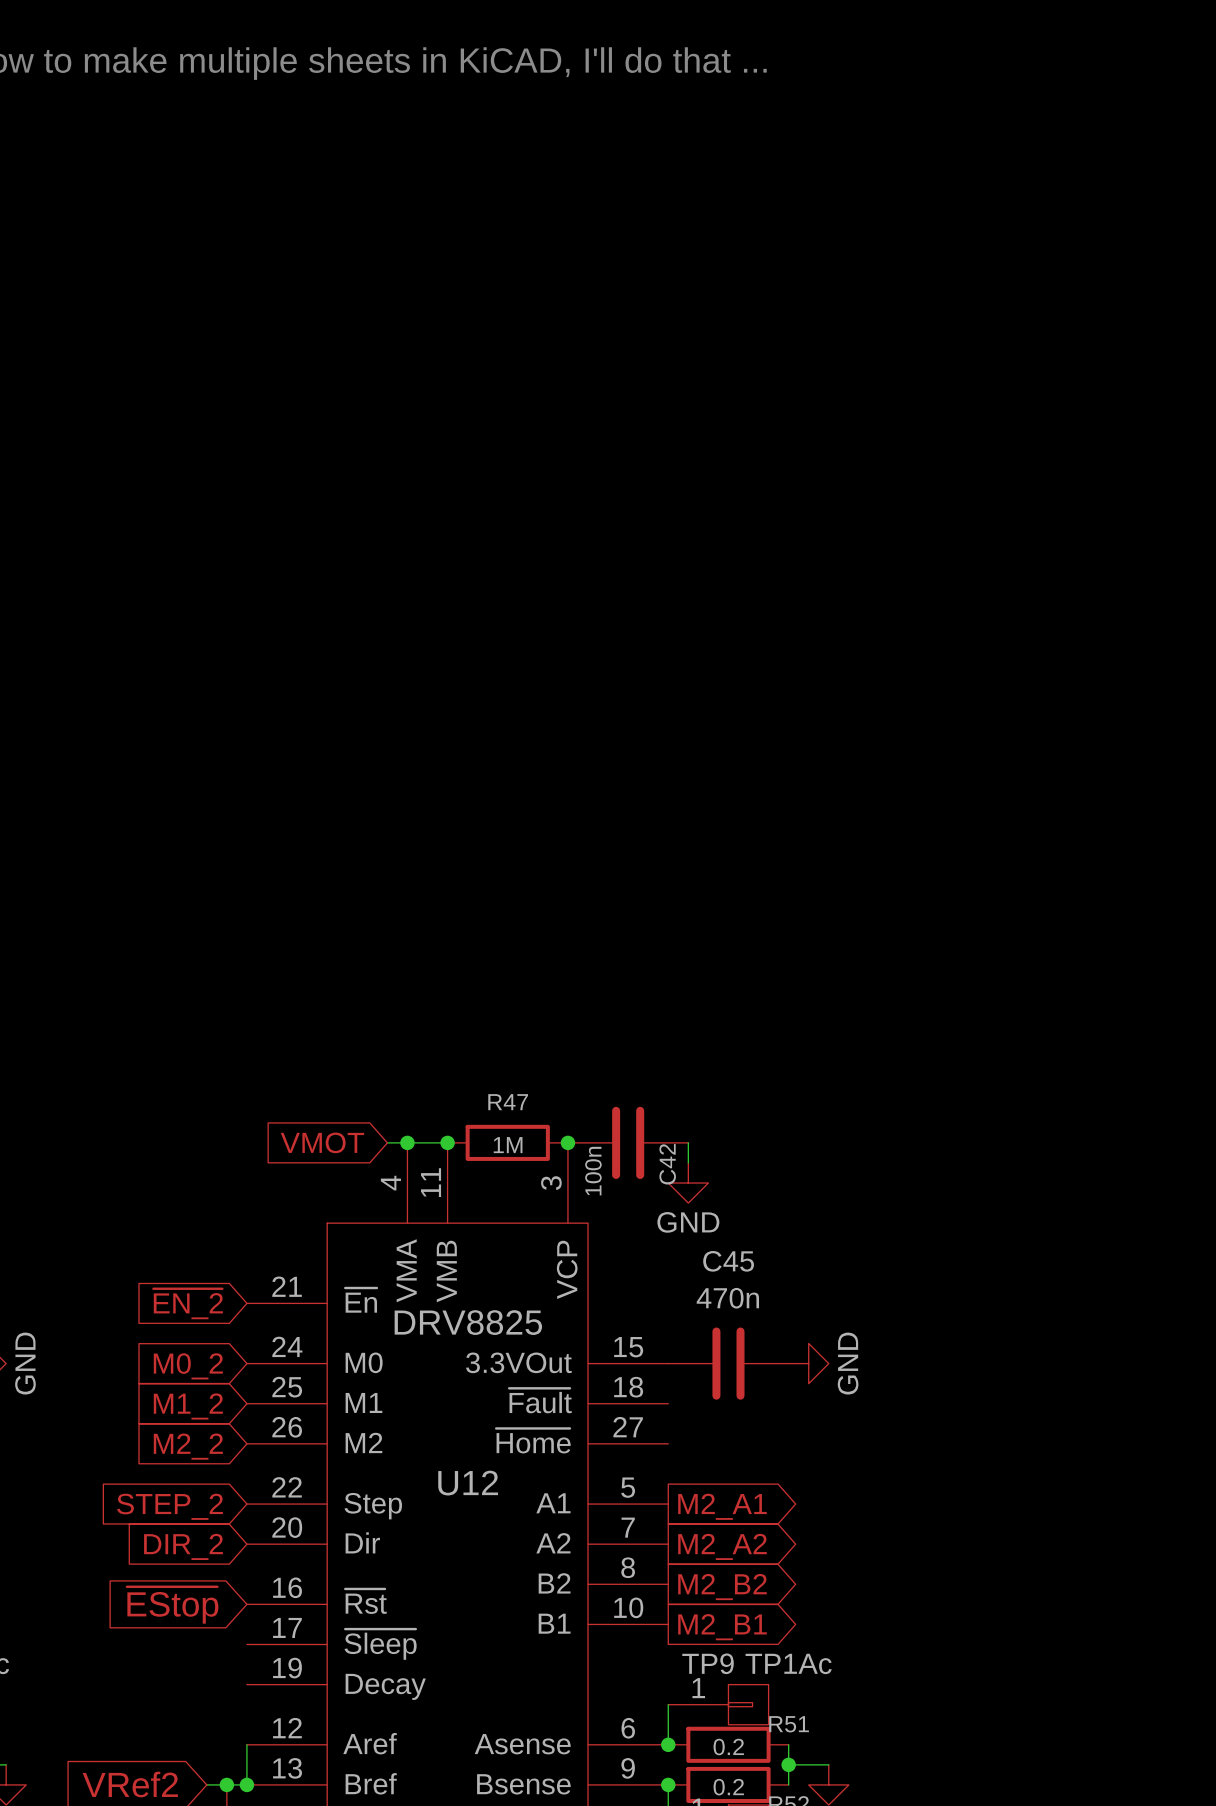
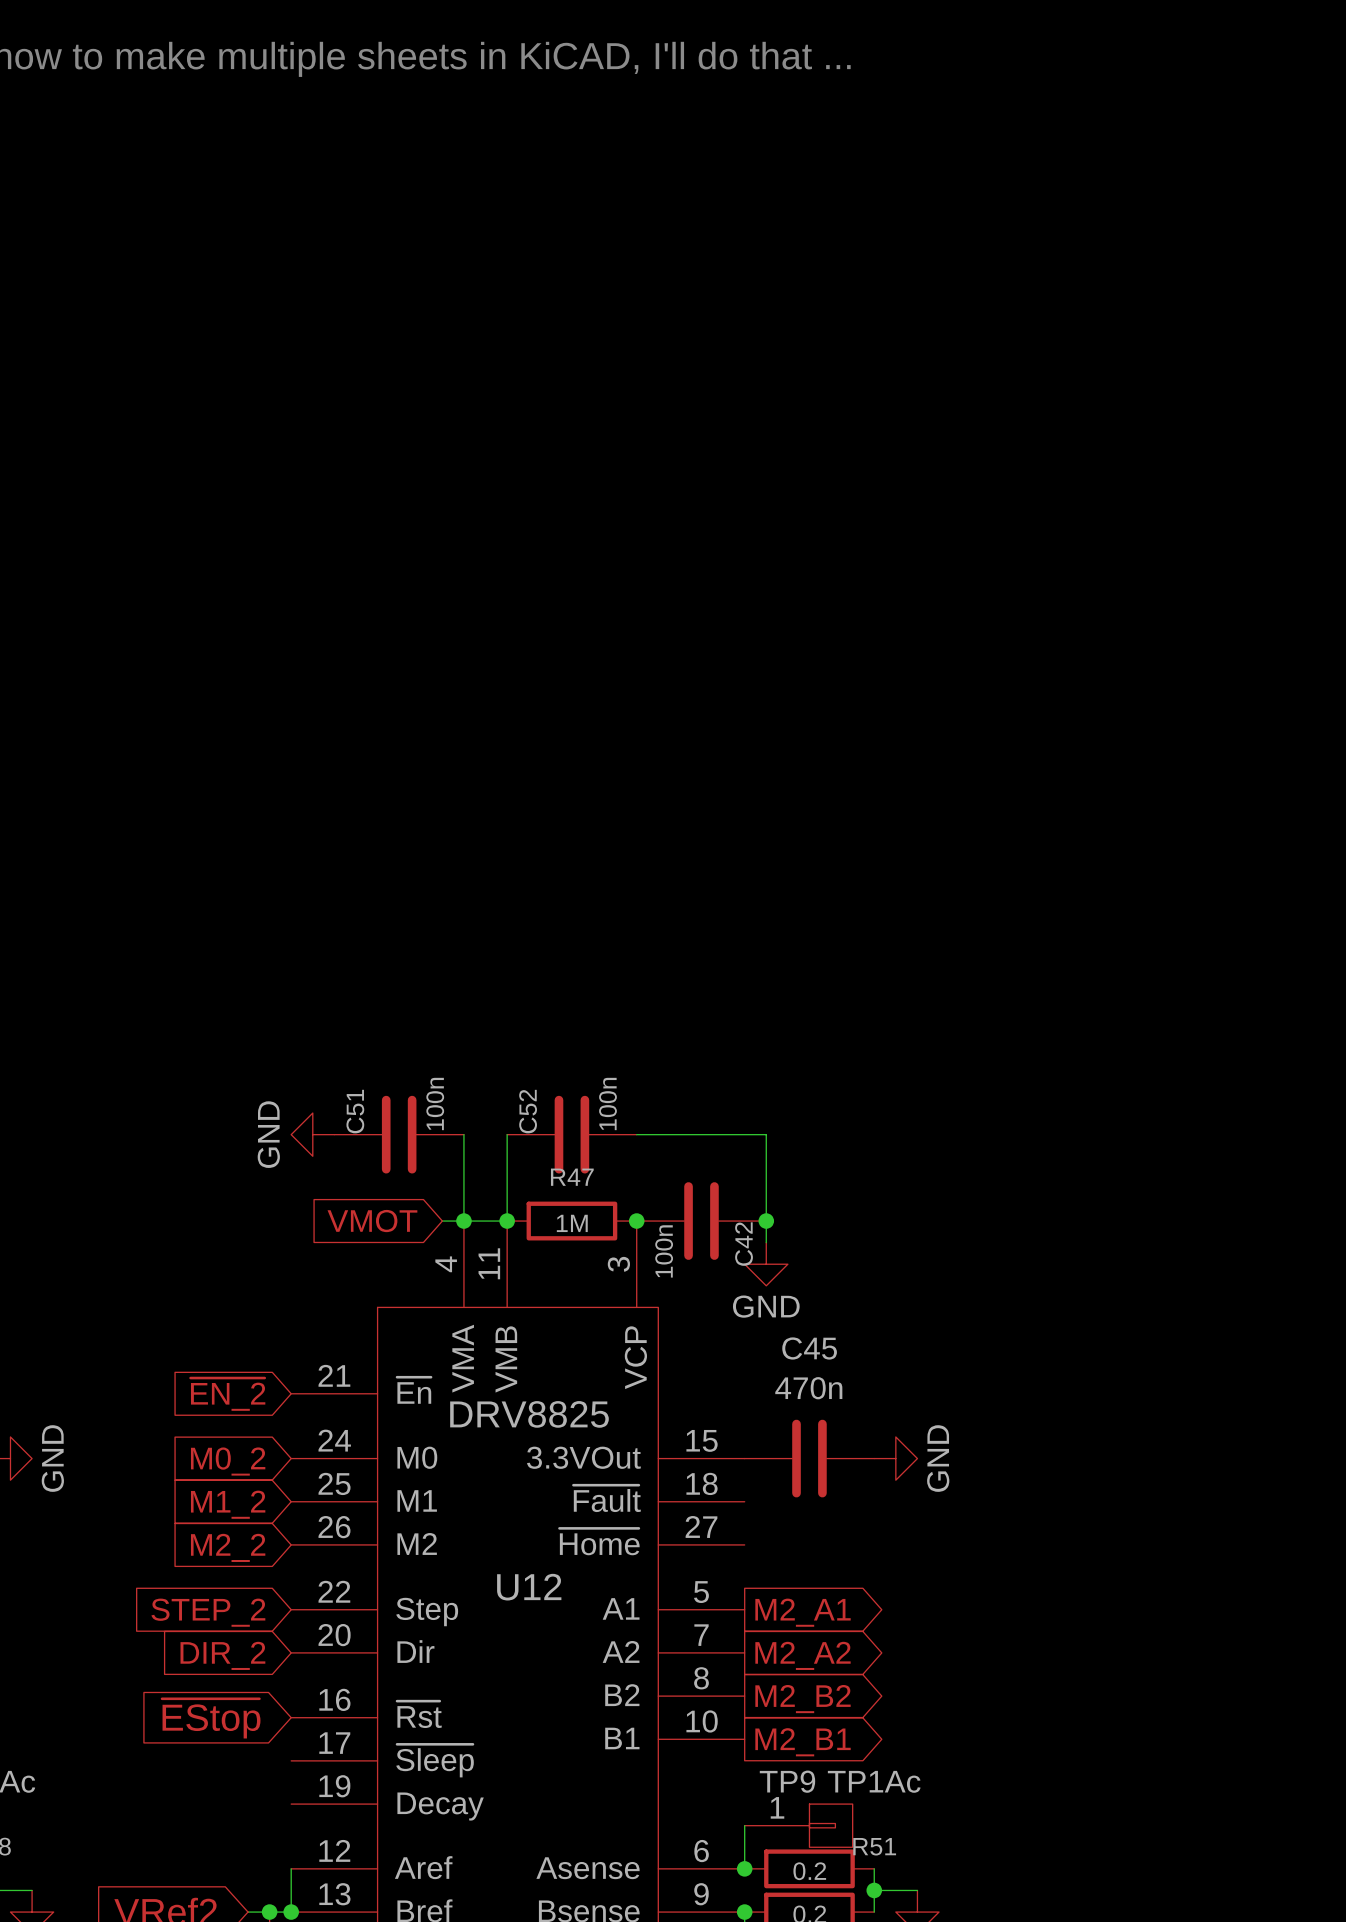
power symbol: none -> GND (312, 1134)
C51: none -> 100n (399, 1134)
wire: none -> (463, 1134) (463, 1221)
wire: none -> (507, 1134) (507, 1221)
C52: none -> 100n (571, 1134)
wire: none -> (636, 1134) (766, 1134) (766, 1221)
junction: none -> (766, 1221)

